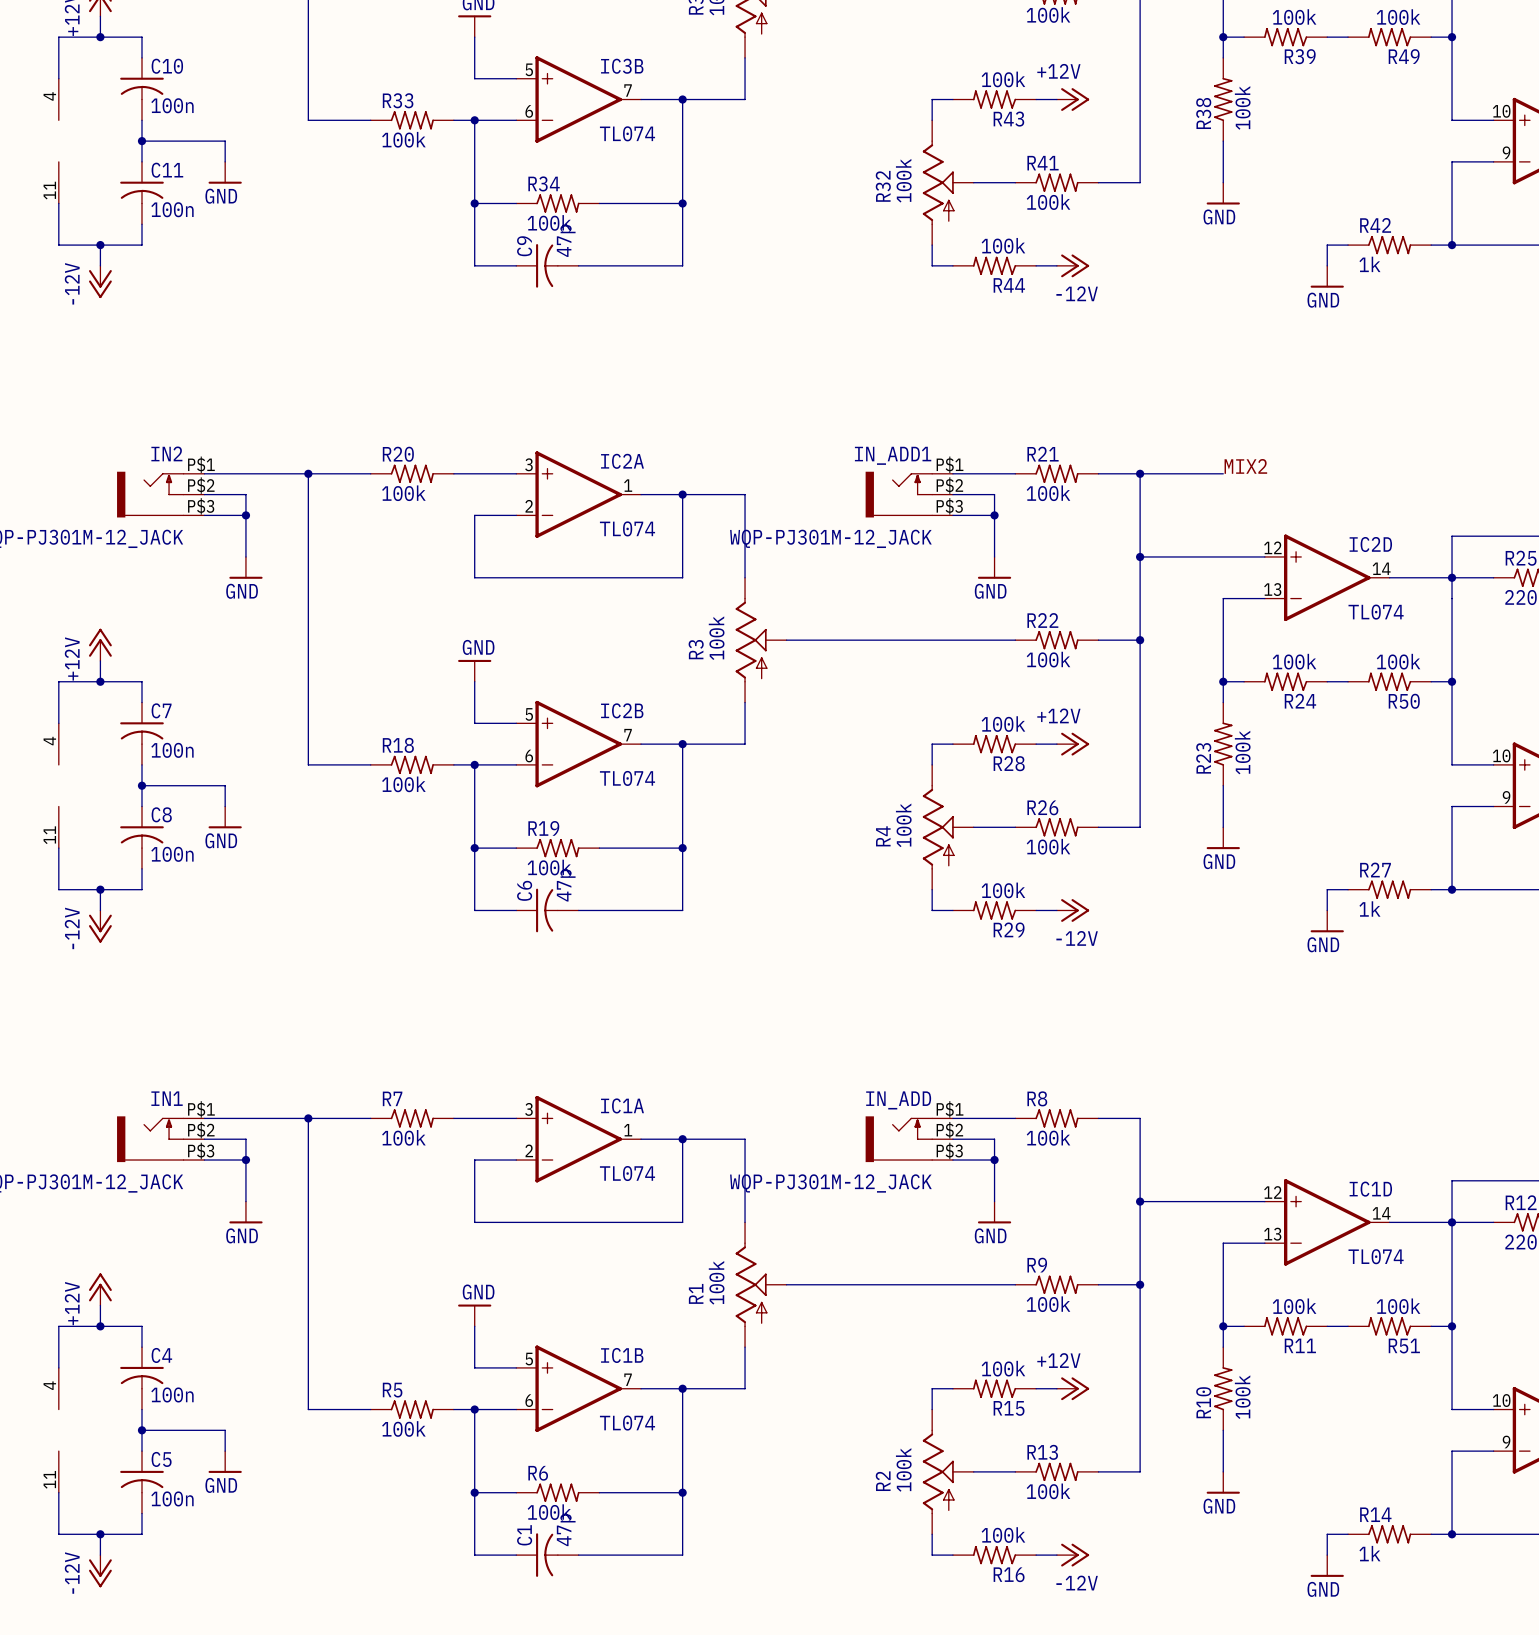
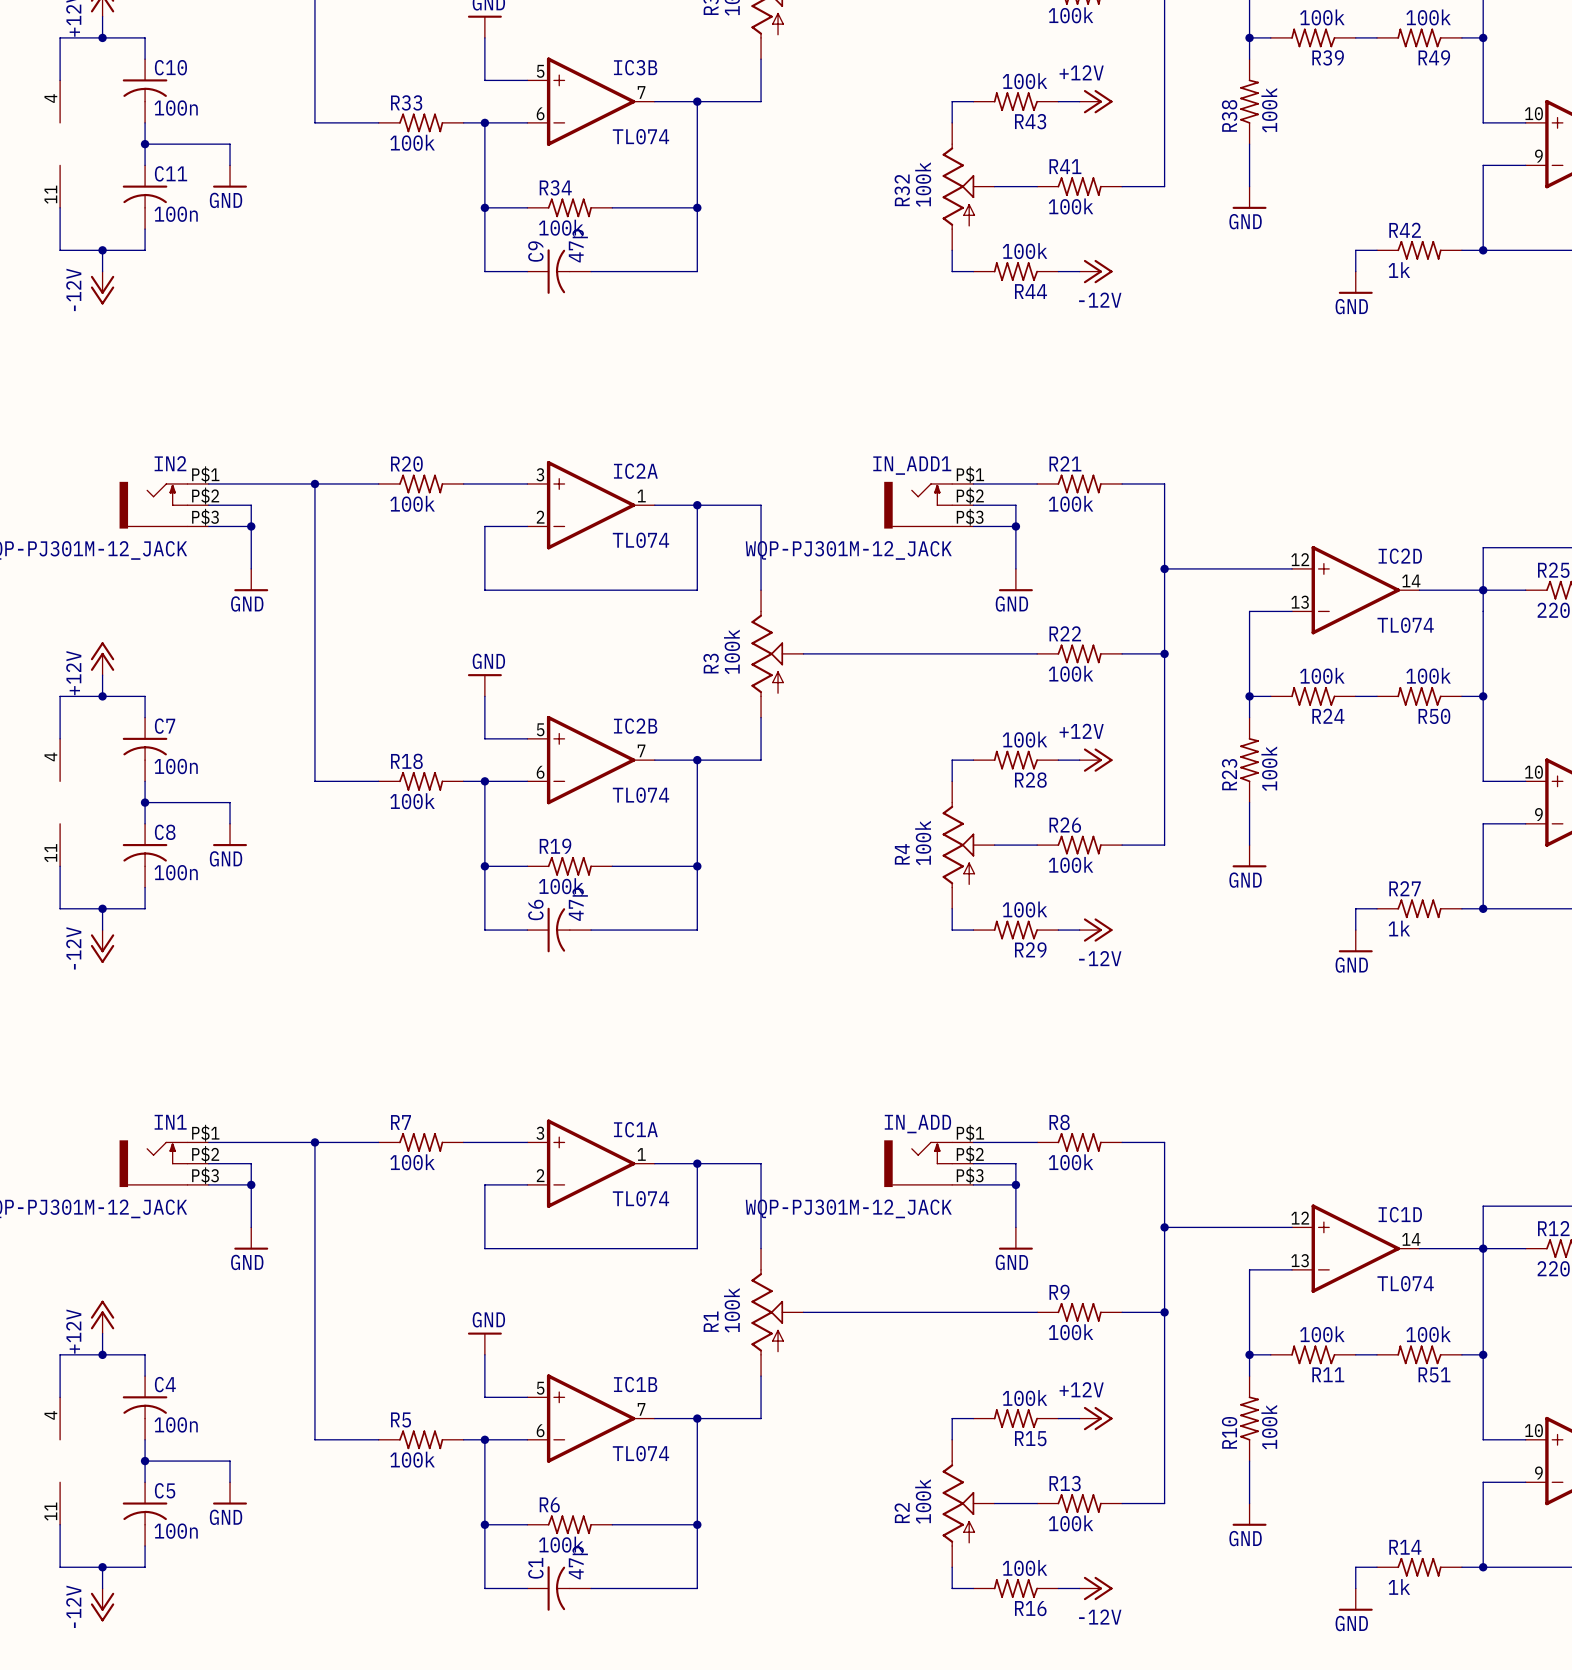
label: MIX2 (1245, 466) -> none
wire: (1140, 473) (1223, 473) -> none
junction: (1140, 473) -> none

